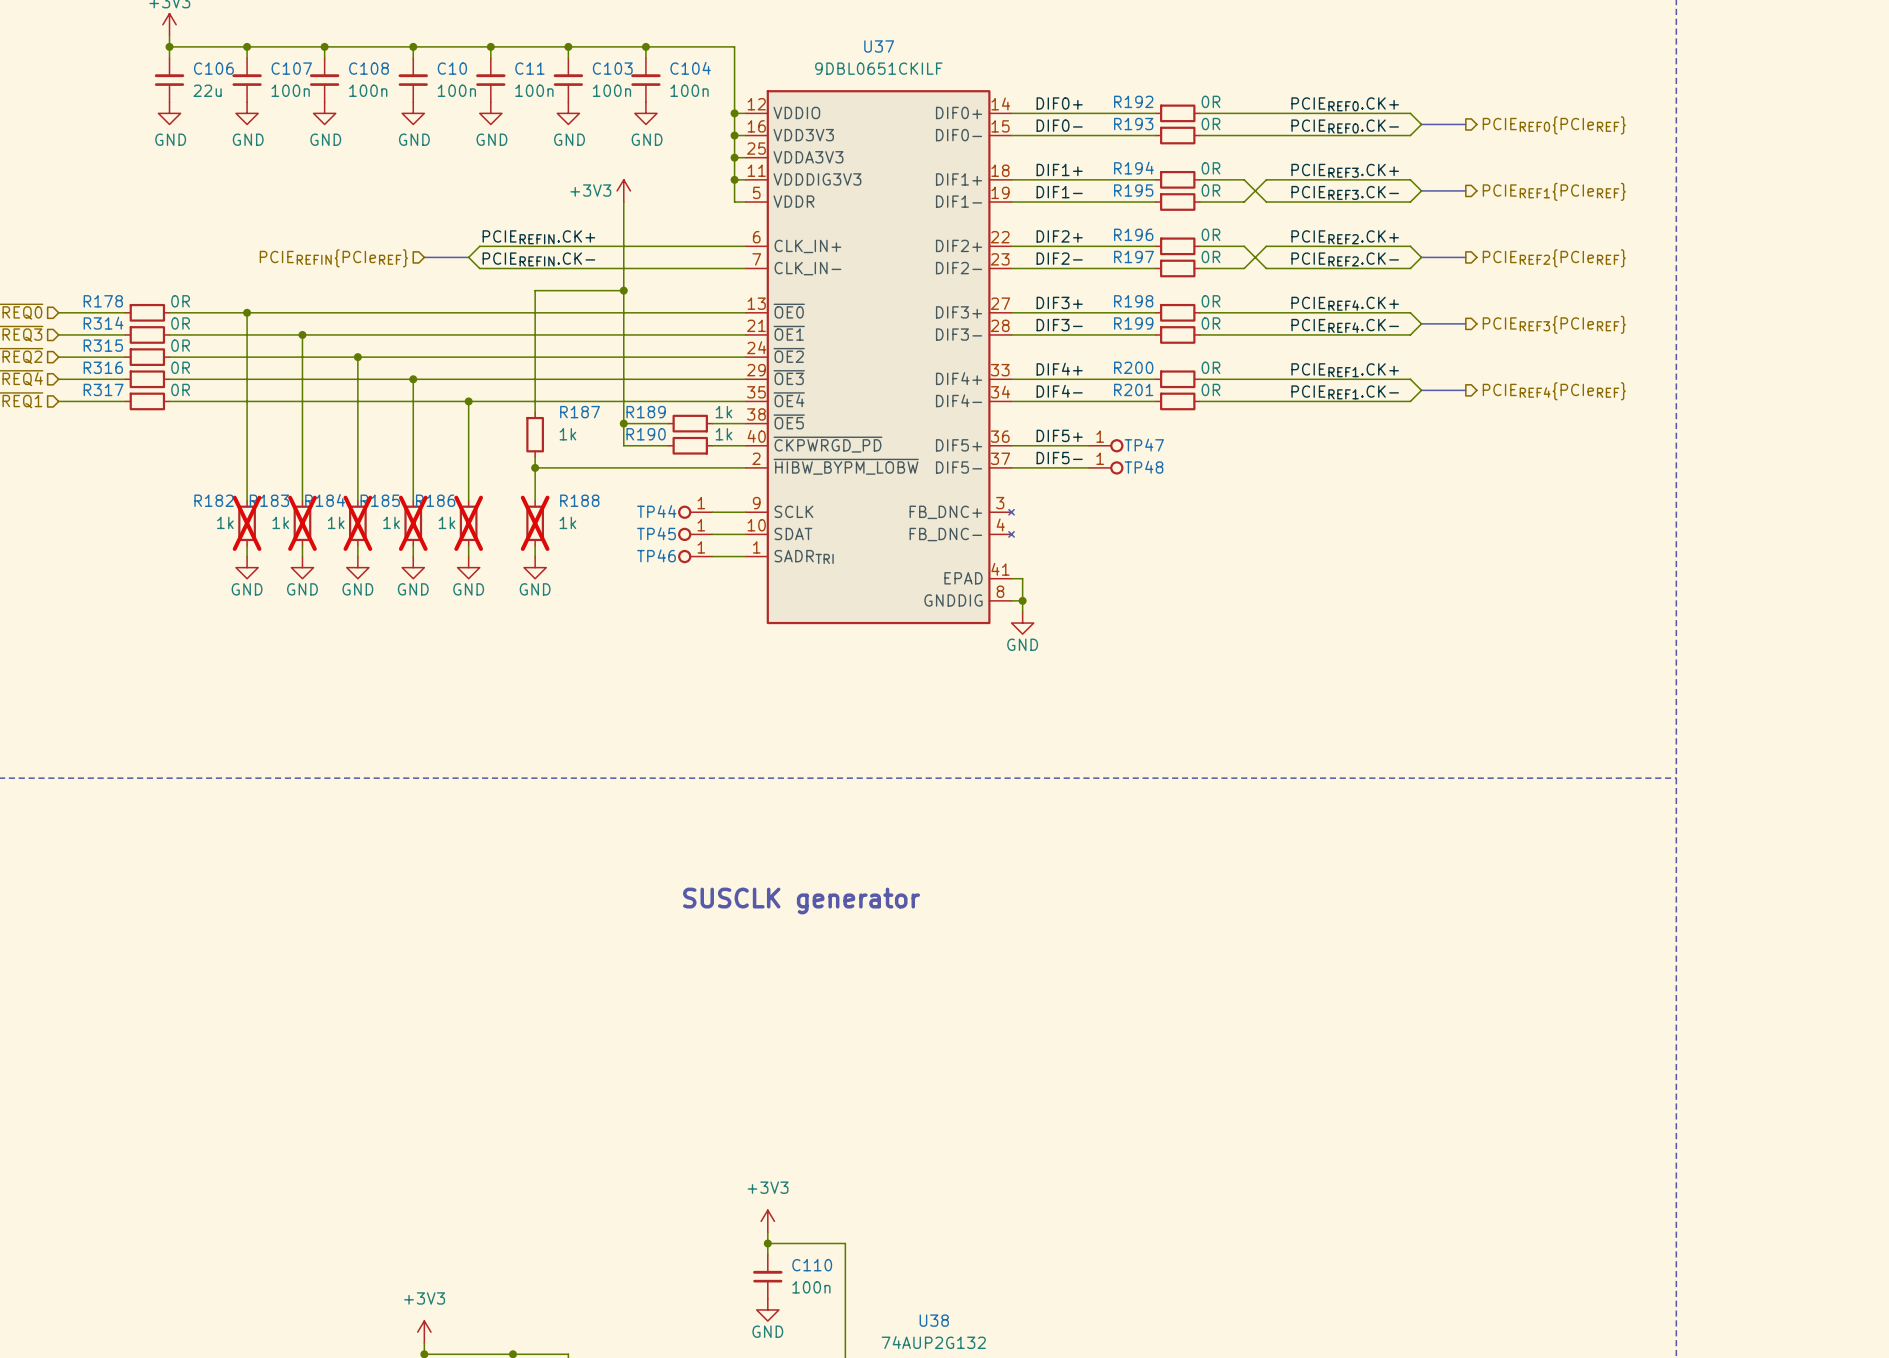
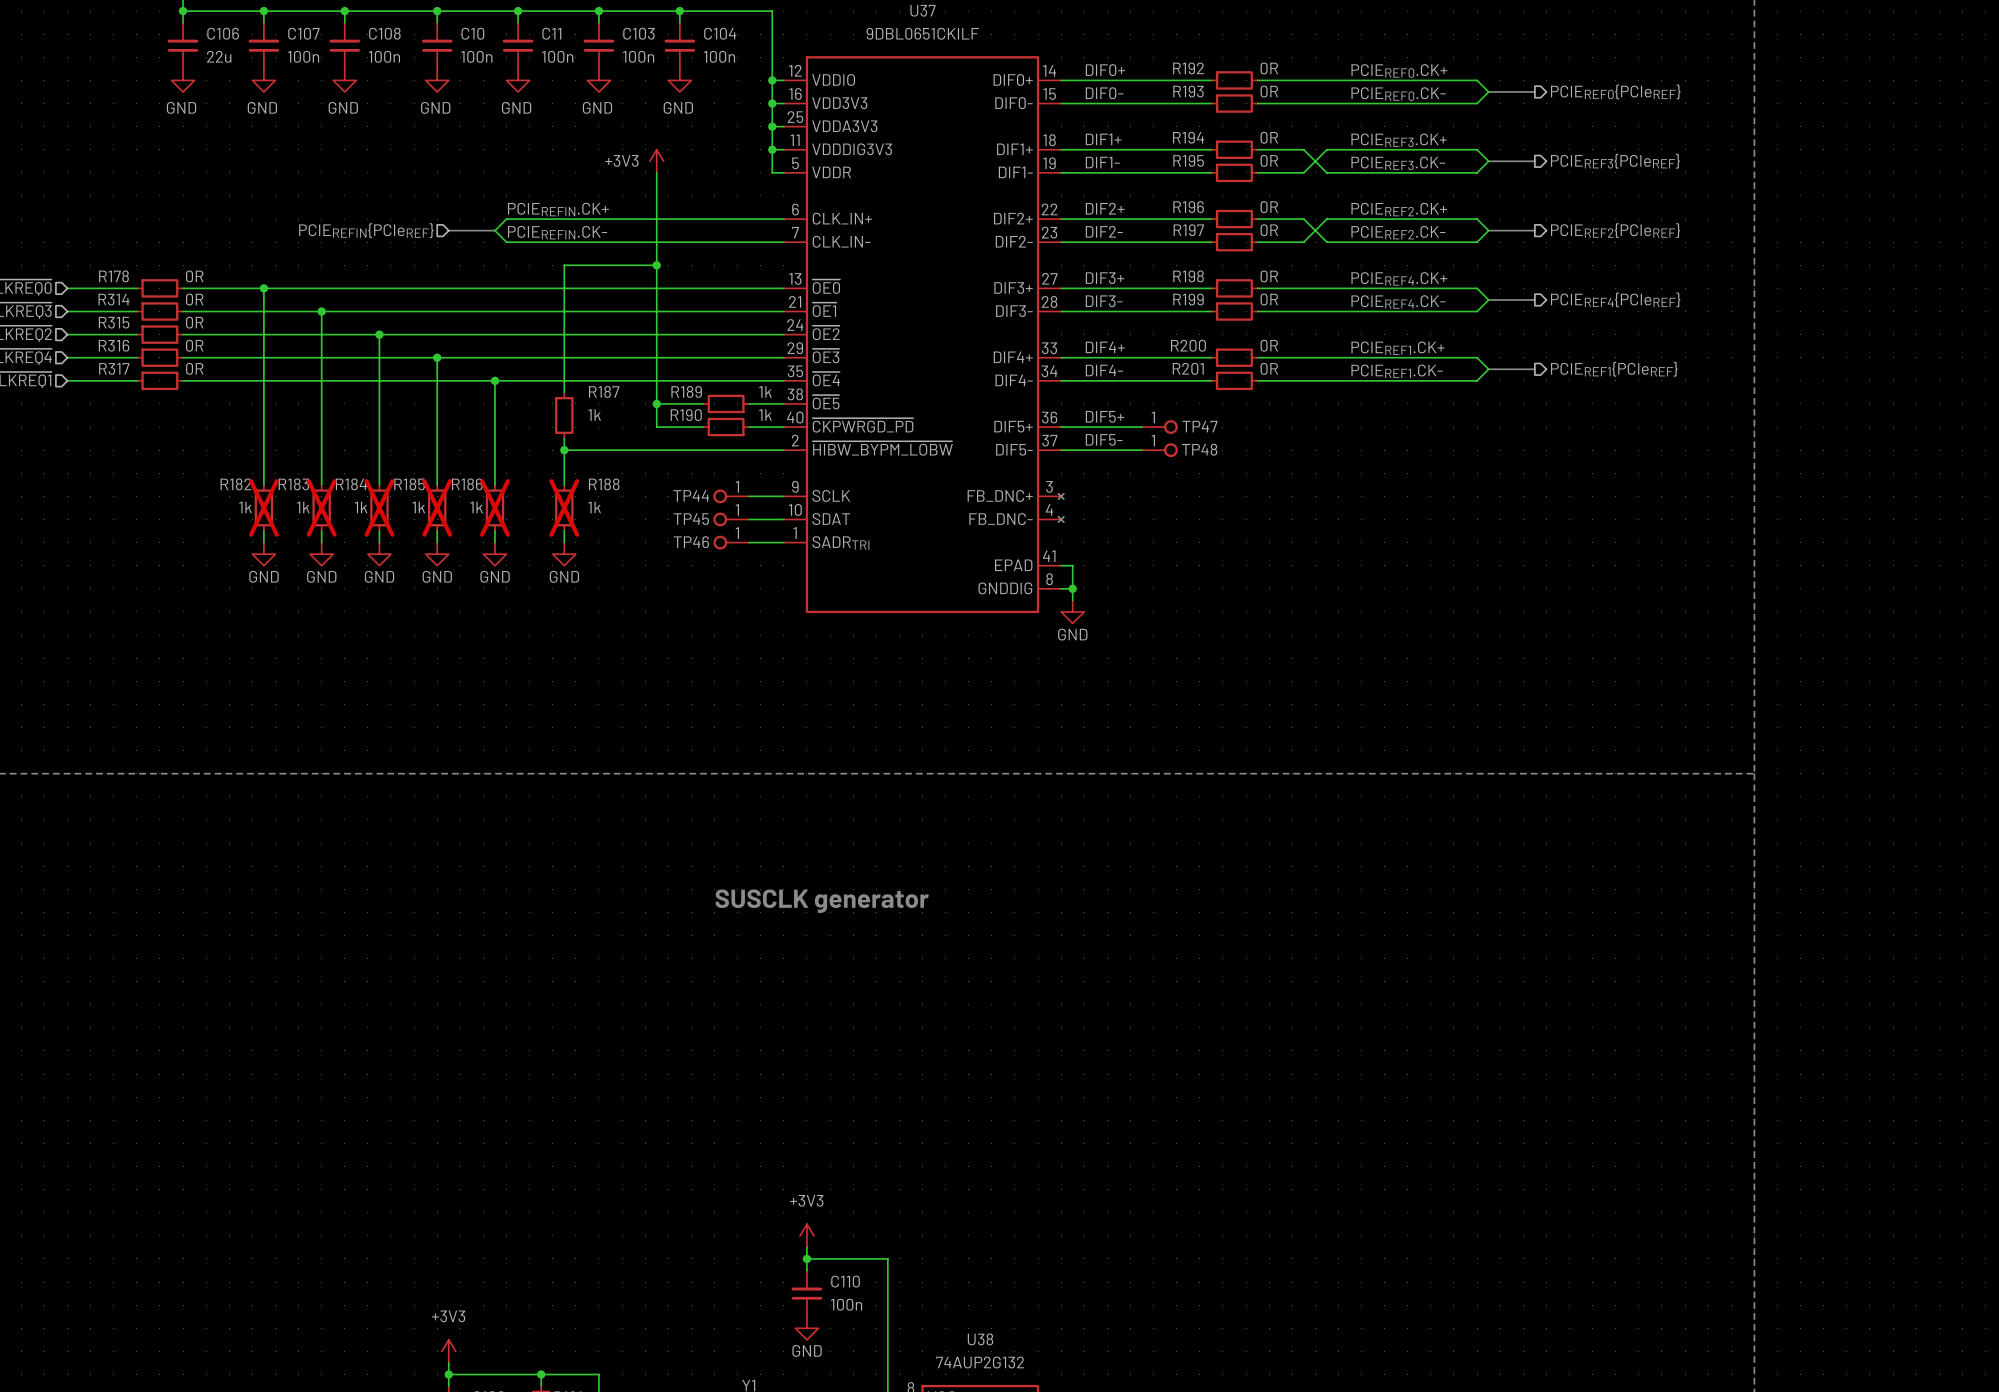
hierarchical label: PCIEREF1{PCIeREF} (1554, 191) -> PCIEREF3{PCIeREF} (1615, 161)
hierarchical label: PCIEREF3{PCIeREF} (1554, 324) -> PCIEREF4{PCIeREF} (1615, 299)
hierarchical label: PCIEREF4{PCIeREF} (1554, 391) -> PCIEREF1{PCIeREF} (1614, 369)

